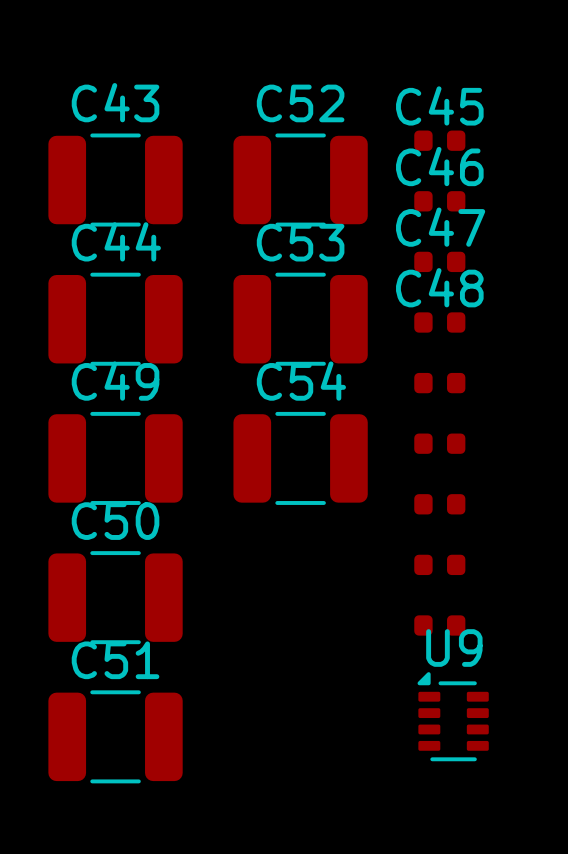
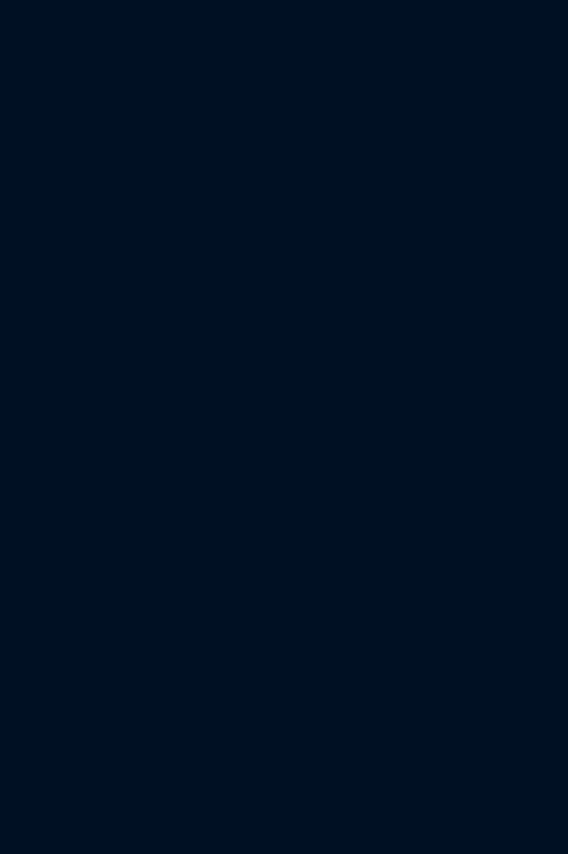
C45: (439, 140) -> none
C43: (115, 180) -> none
C52: (300, 180) -> none
C46: (439, 201) -> none
C47: (439, 261) -> none
C44: (115, 319) -> none
C53: (300, 319) -> none
C48: (439, 322) -> none
part: (439, 383) -> none
part: (439, 443) -> none
C49: (115, 458) -> none
C54: (300, 458) -> none
part: (439, 504) -> none
part: (439, 564) -> none
C50: (115, 597) -> none
part: (439, 625) -> none
U9: (453, 716) -> none
C51: (115, 736) -> none

